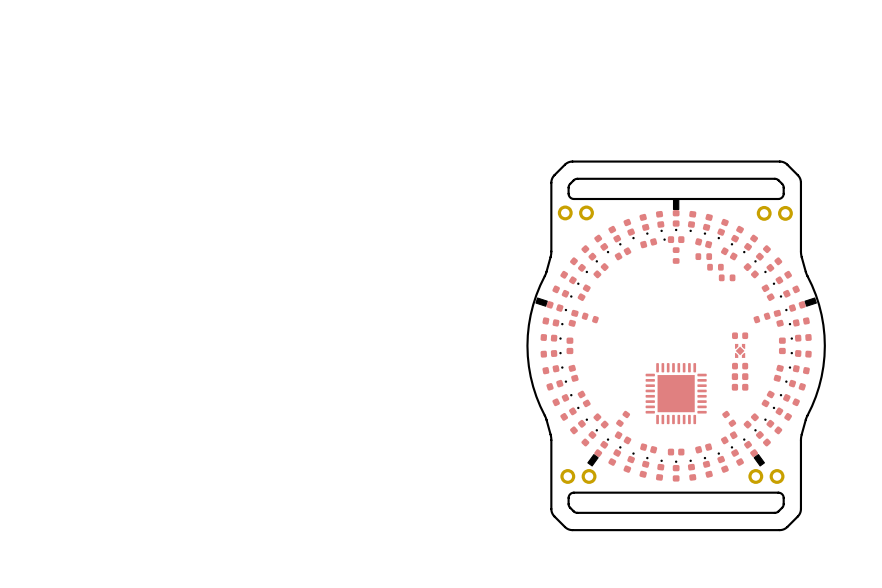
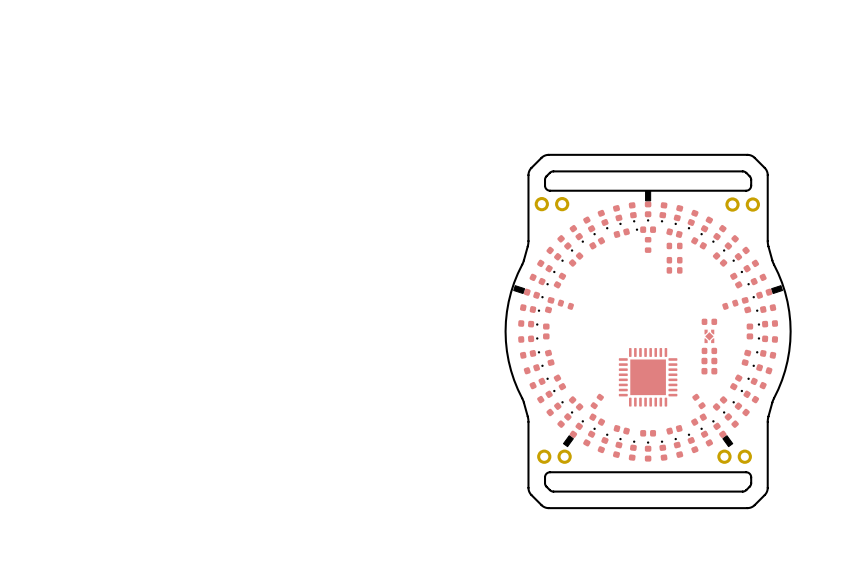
part: (715, 267) -> none
part: none -> (674, 260)
part: (727, 277) -> none
part: none -> (674, 270)

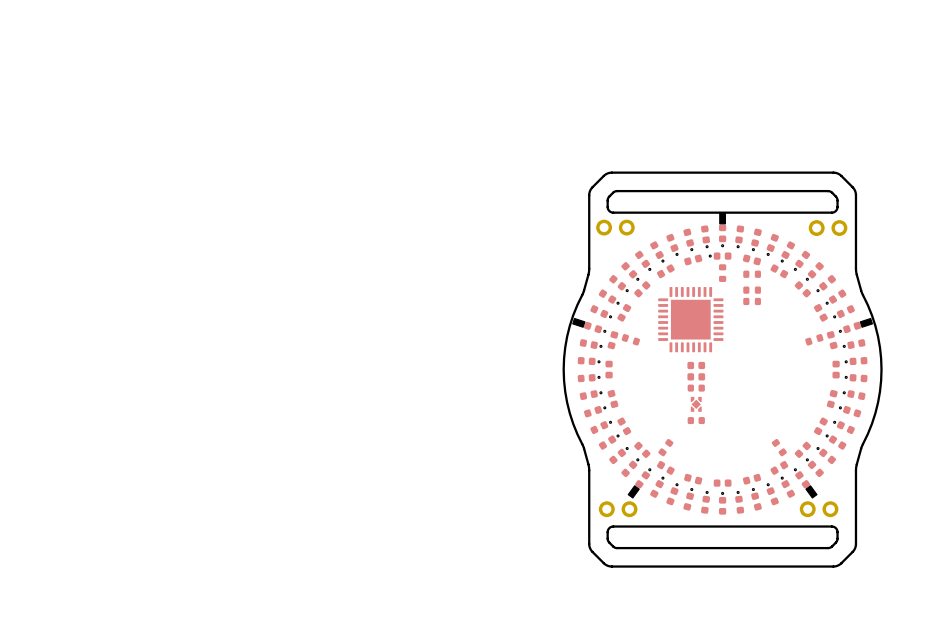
part: (709, 321) -> none
part: none -> (696, 365)
part position: (709, 336) -> (696, 404)
part: none -> (696, 376)
part: none -> (696, 388)
part: (709, 350) -> none
part: (709, 361) -> none
part: (709, 371) -> none
part: none -> (696, 420)
part position: (648, 377) -> (690, 319)

